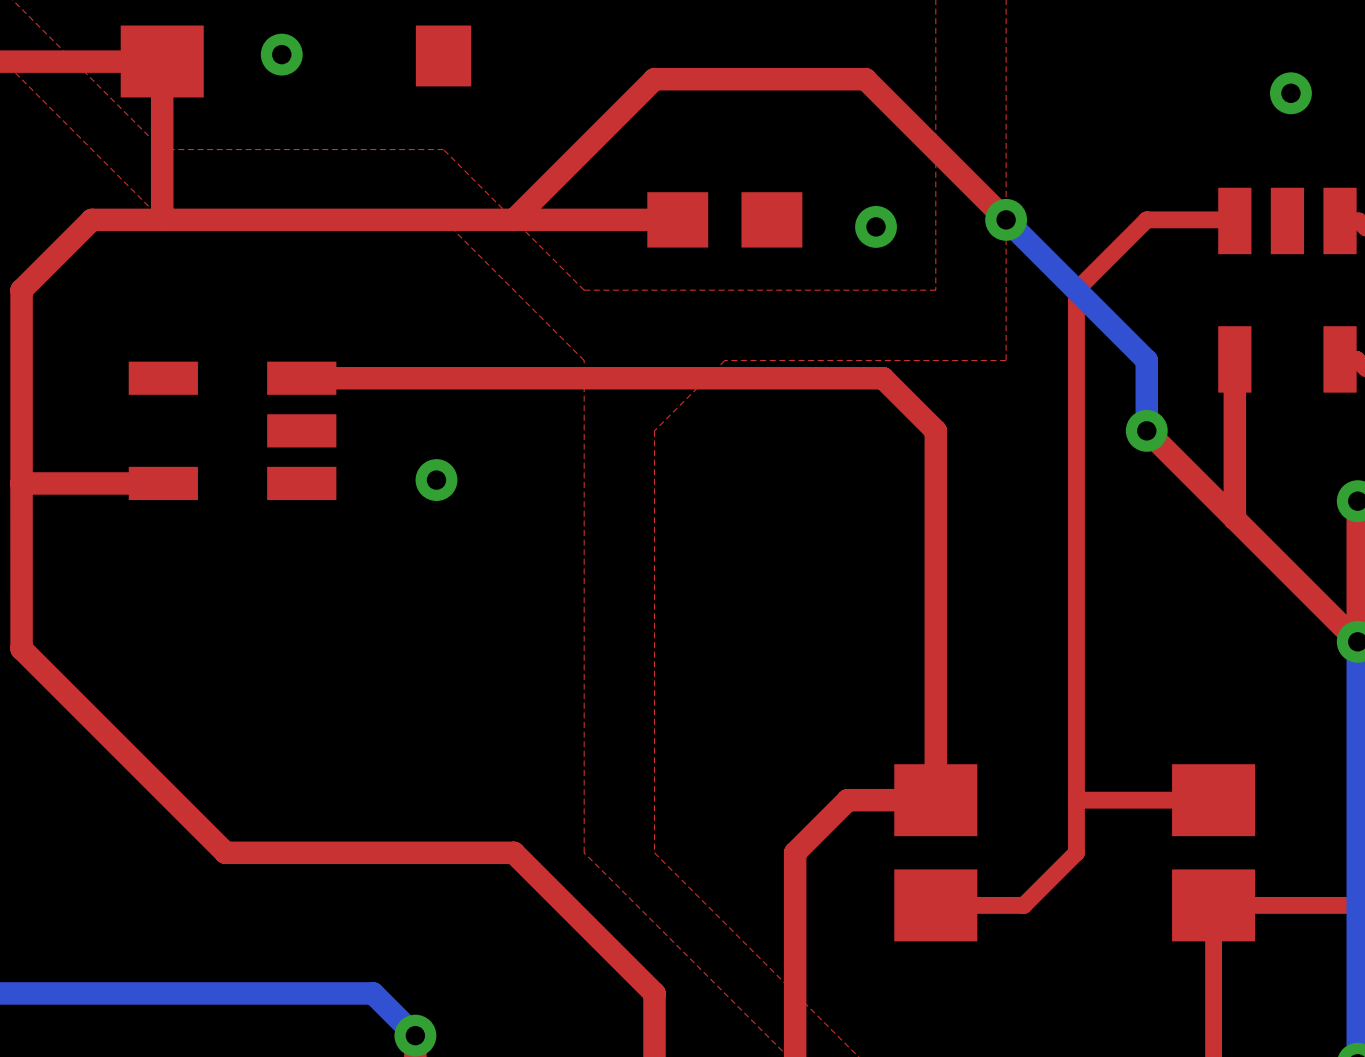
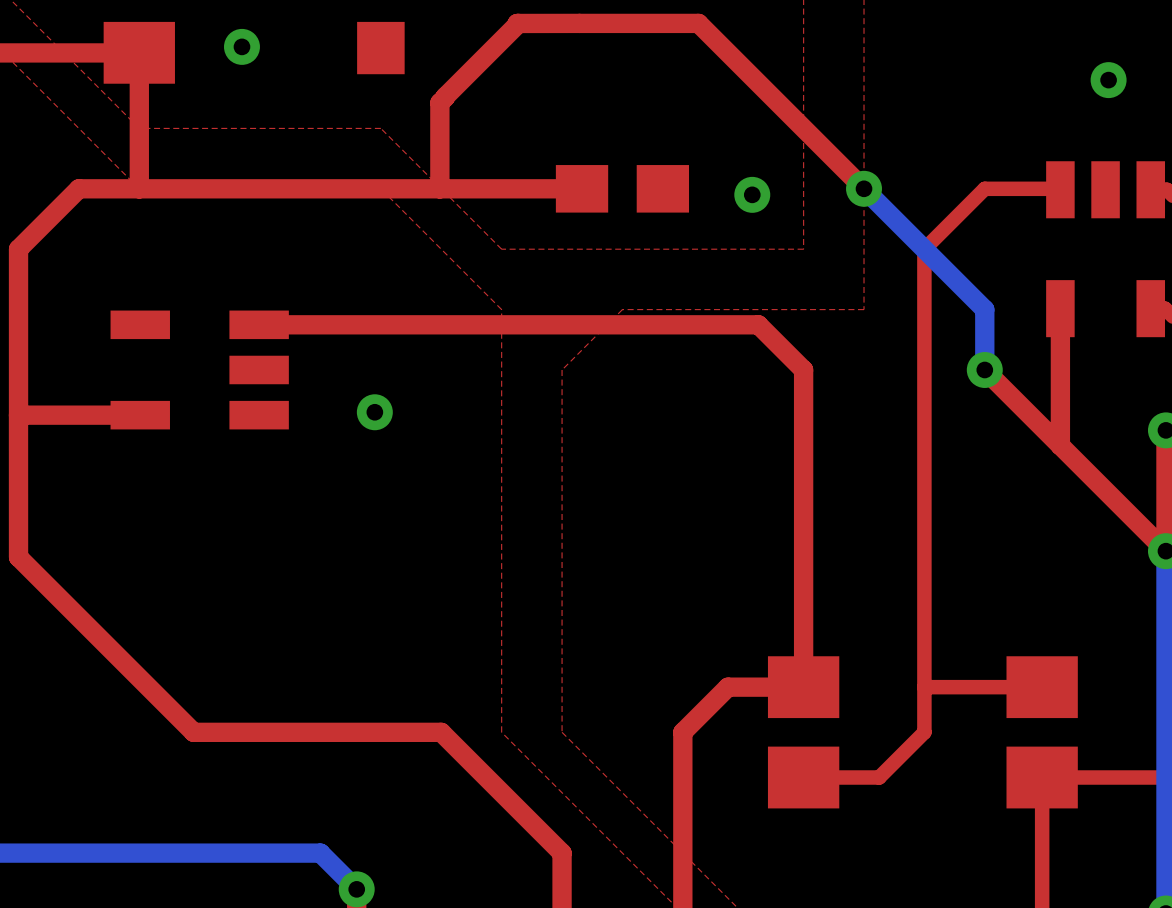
top track: (865, 79) (654, 79) (513, 219) -> (743, 68) (698, 23) (517, 23) (445, 96)
top track: none -> (445, 97) (439, 102) (439, 188)

